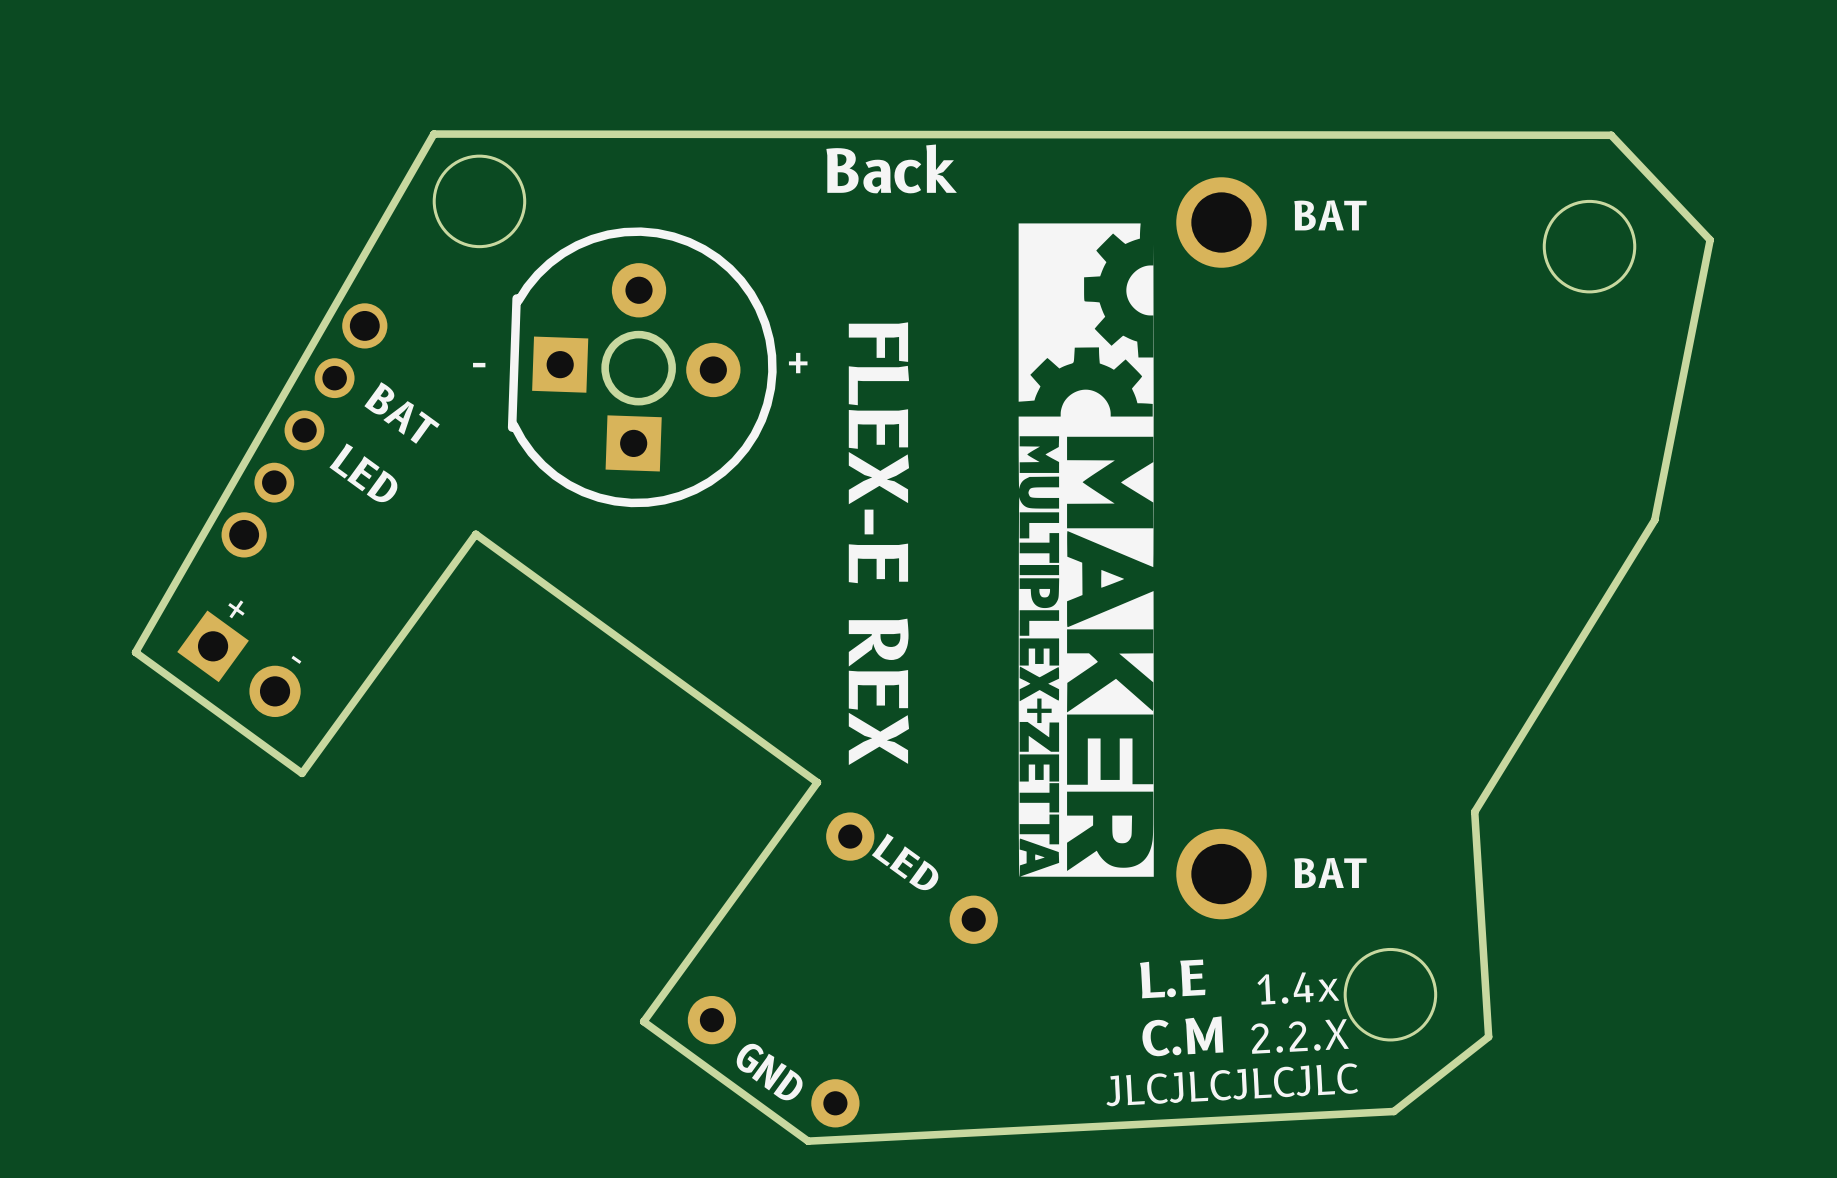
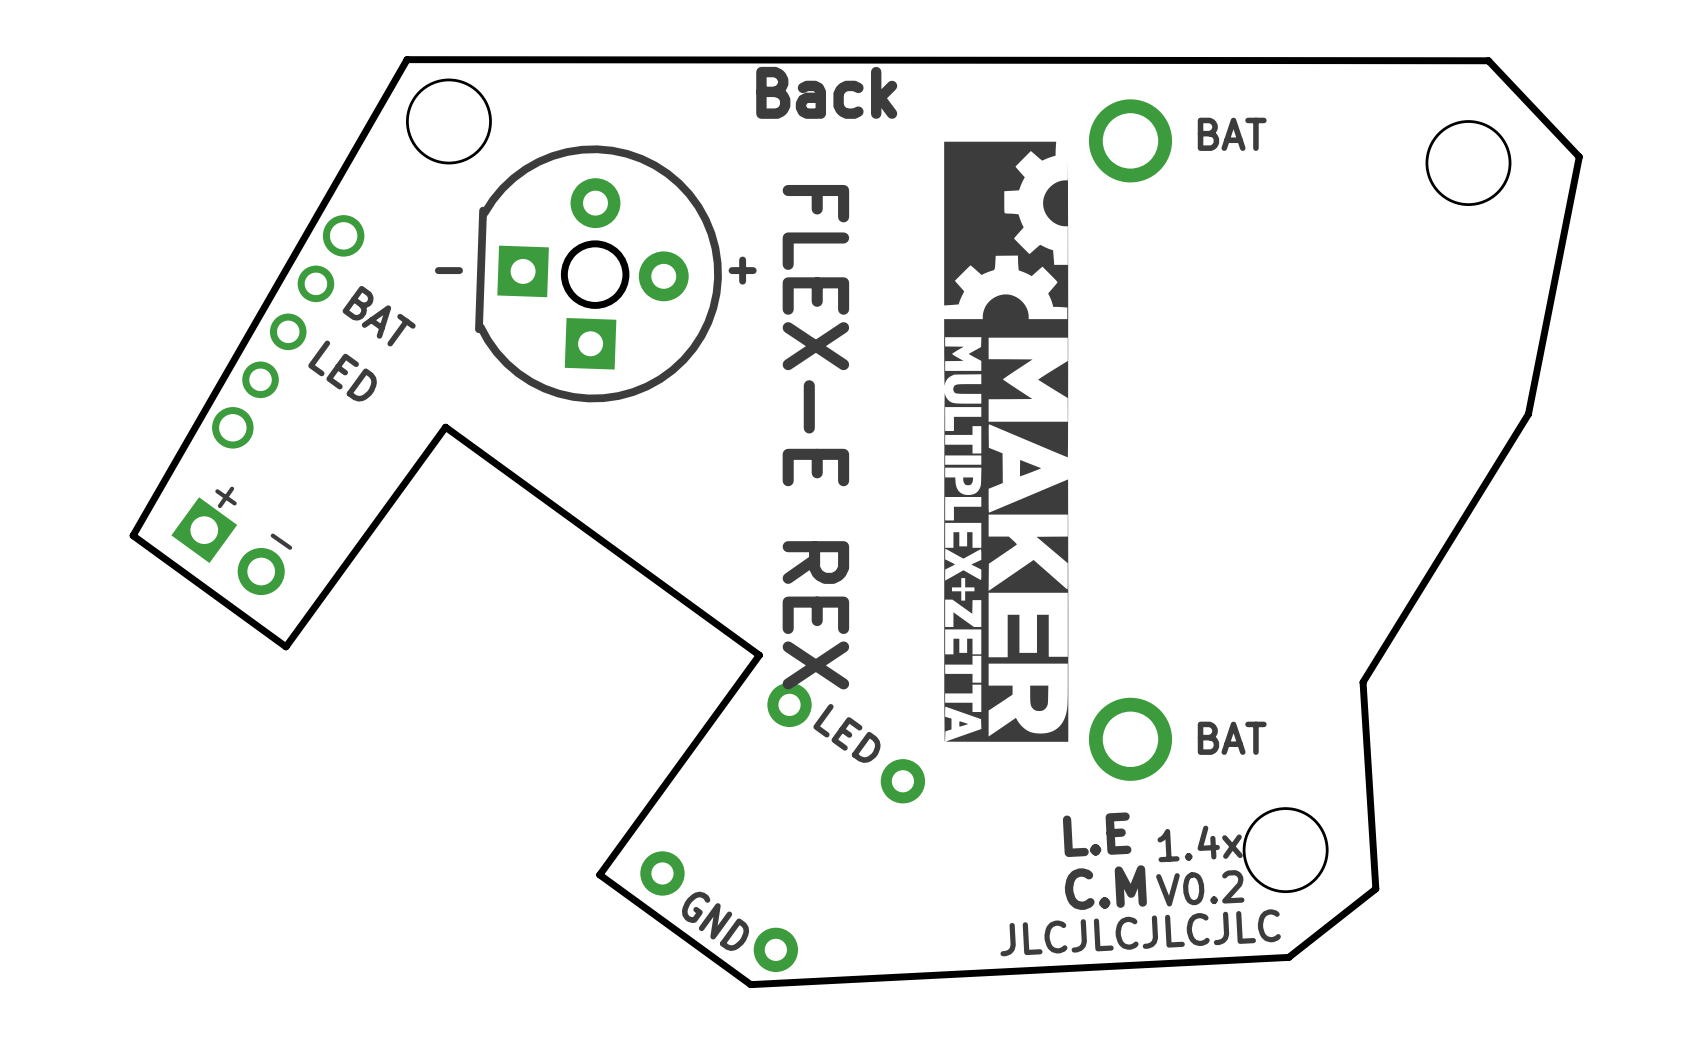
text: 2.2.X (1300, 1036) -> V0.2 (1200, 888)

